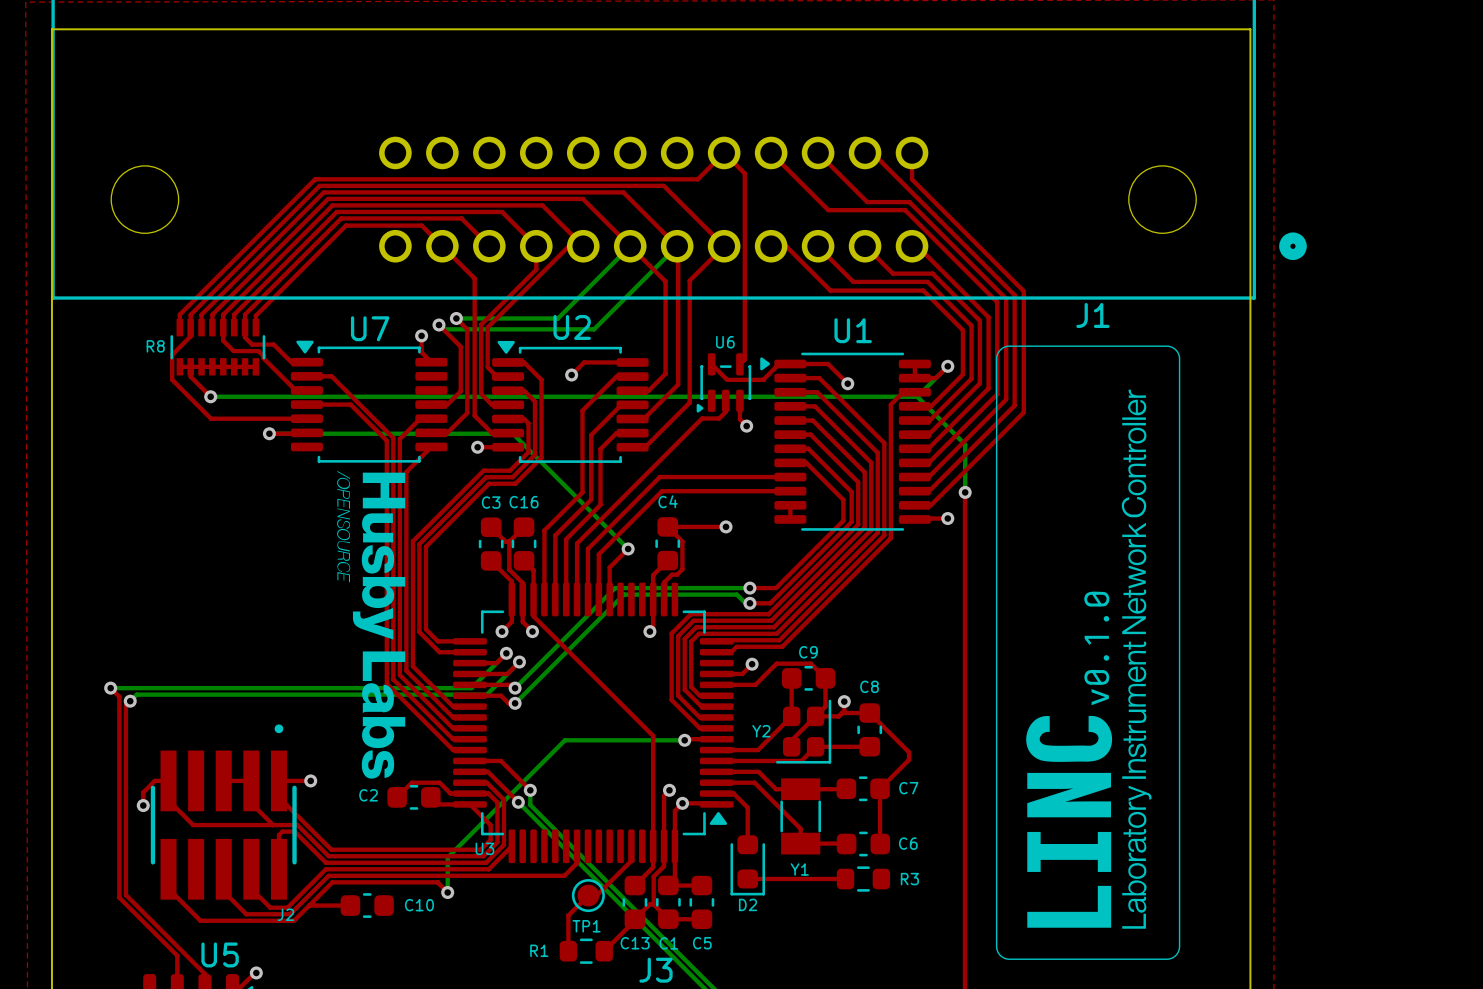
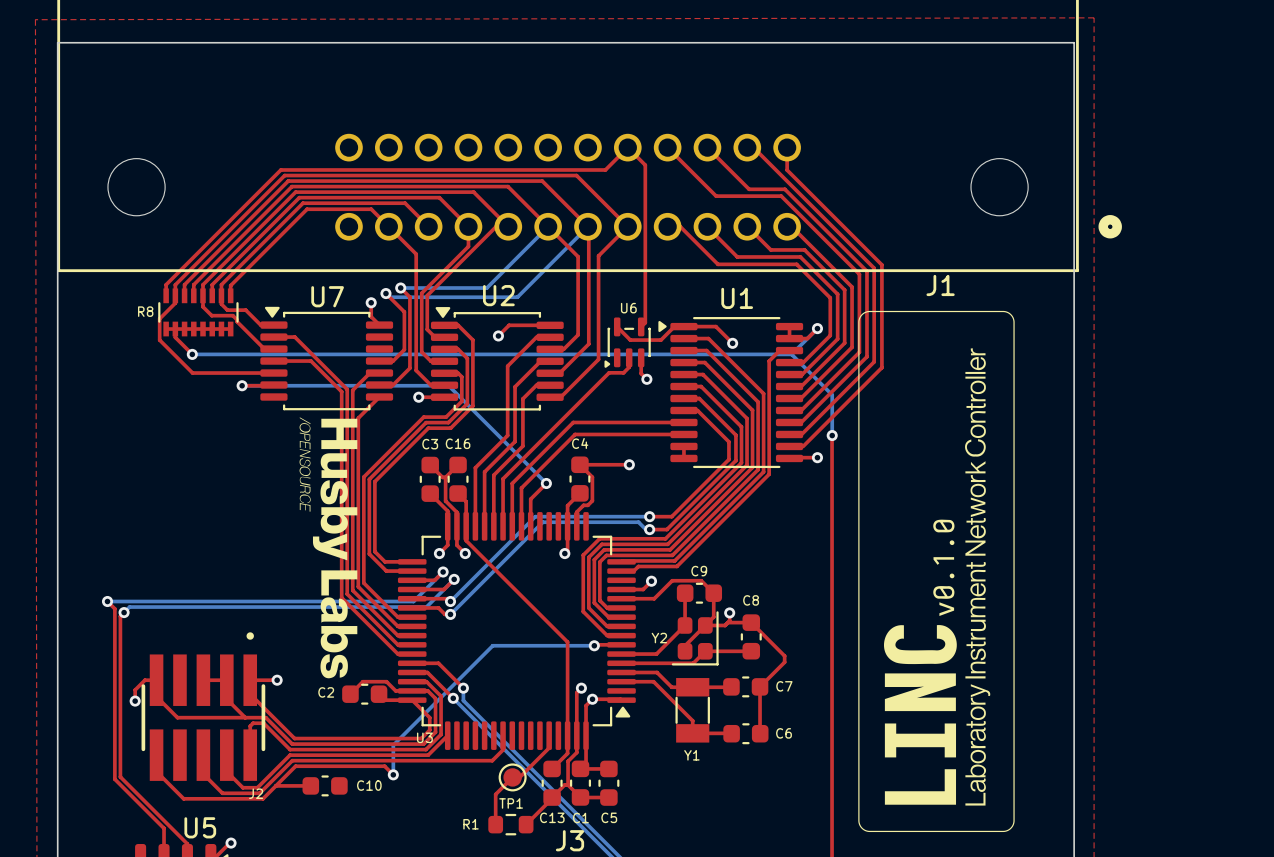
top track: (716, 793) (733, 793) (747, 807) (747, 844) -> none
D2: (747, 865) -> none
top track: (747, 878) (845, 878) -> none
R3: (863, 879) -> none

